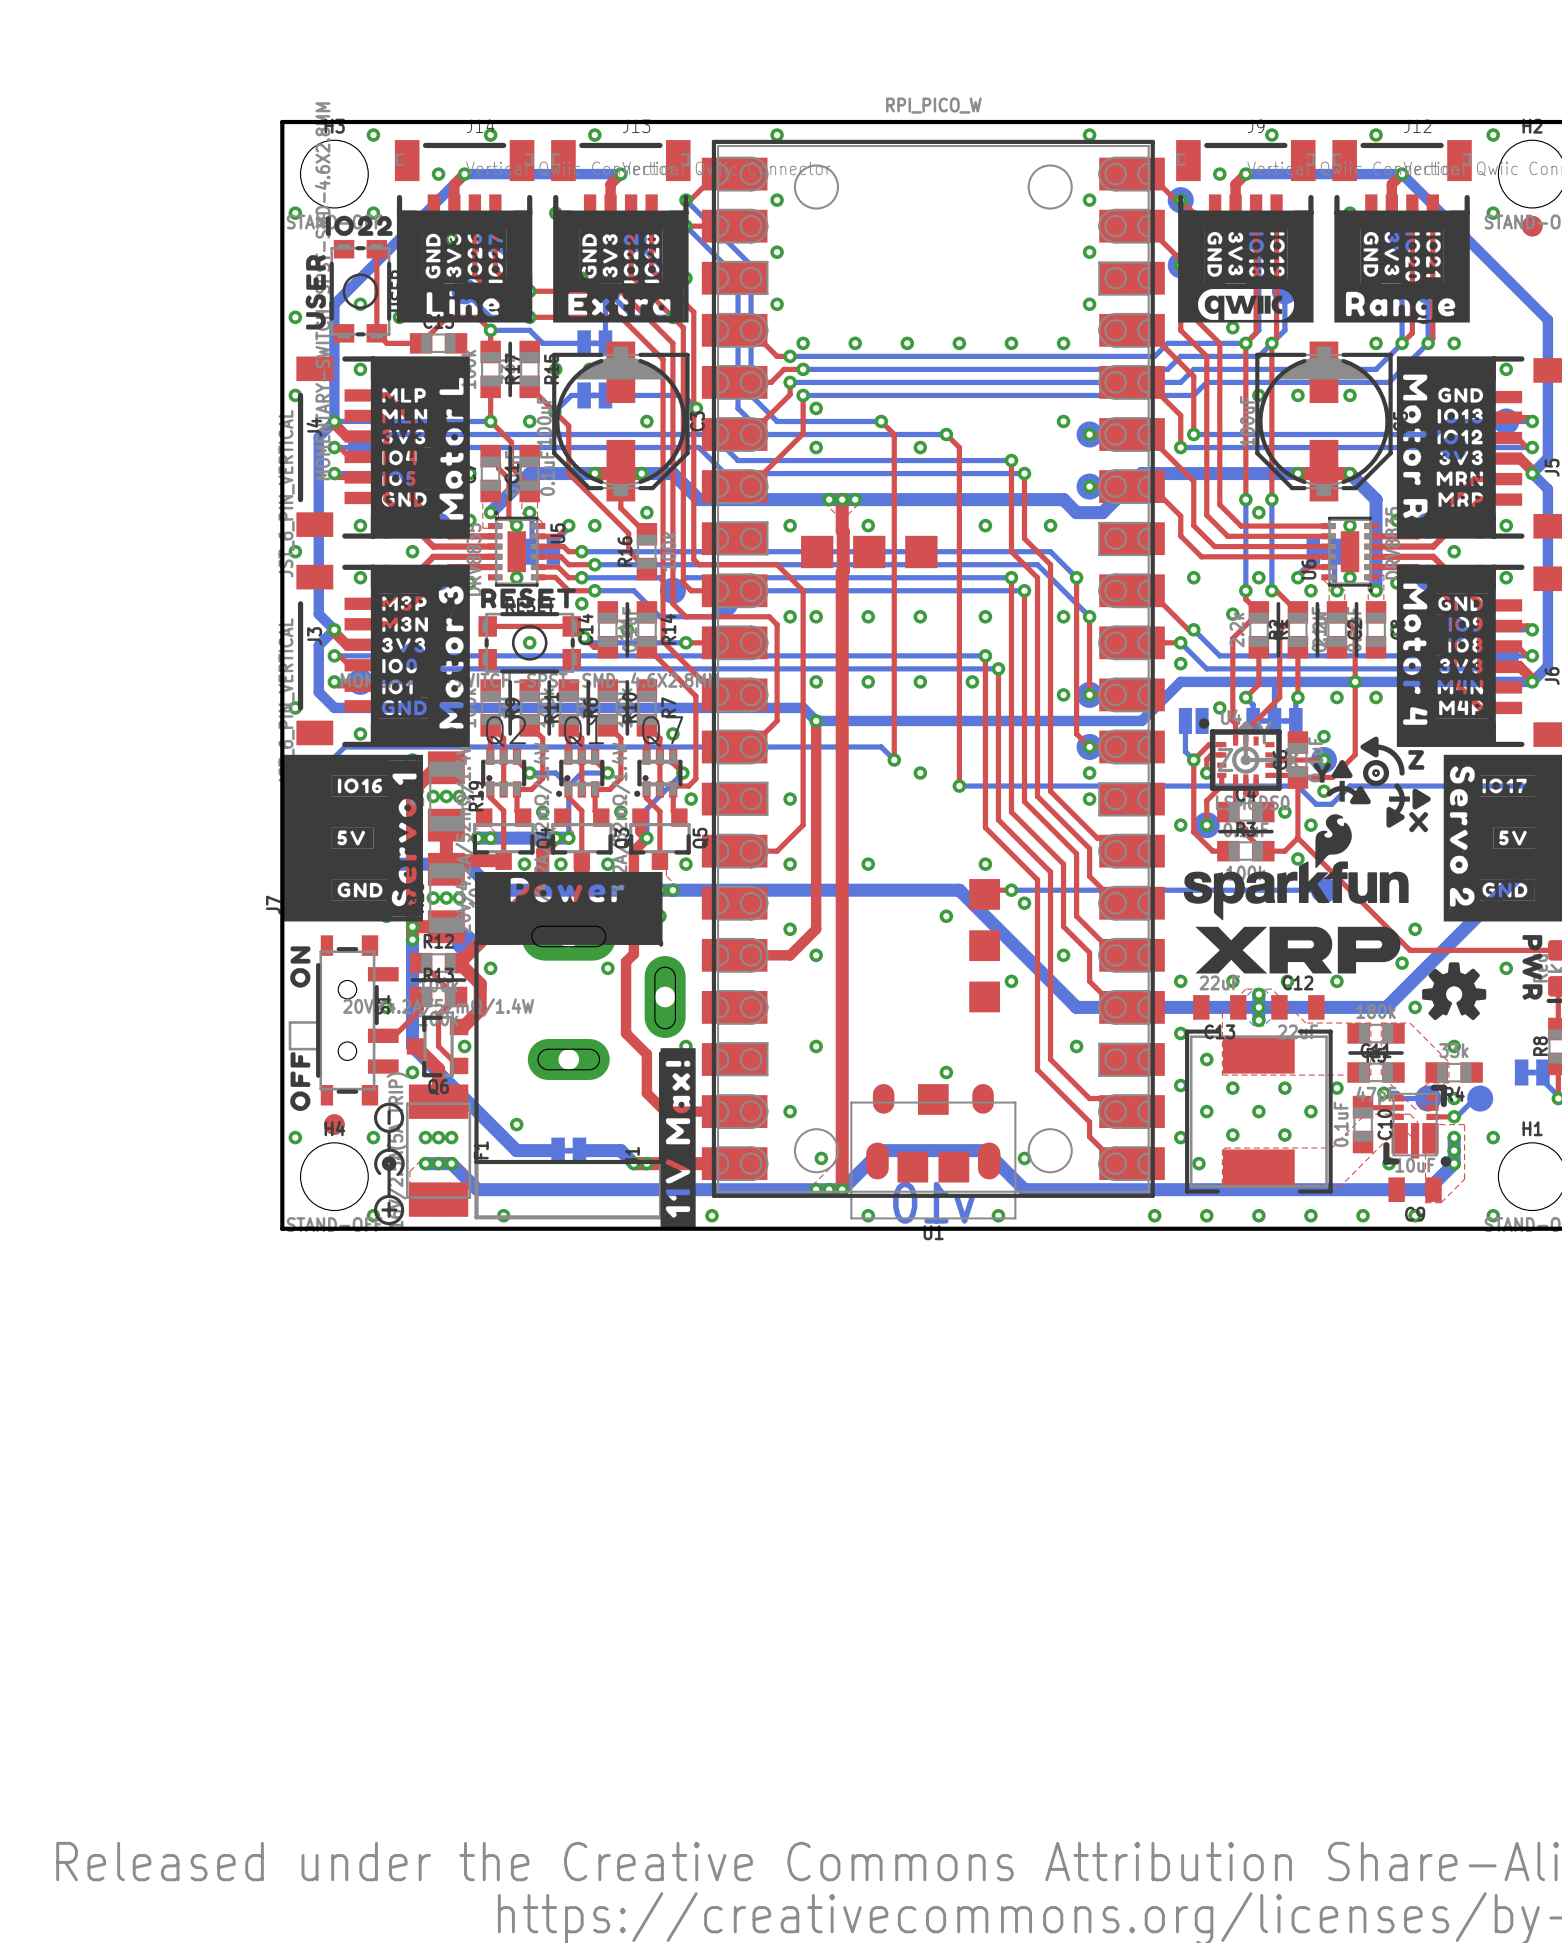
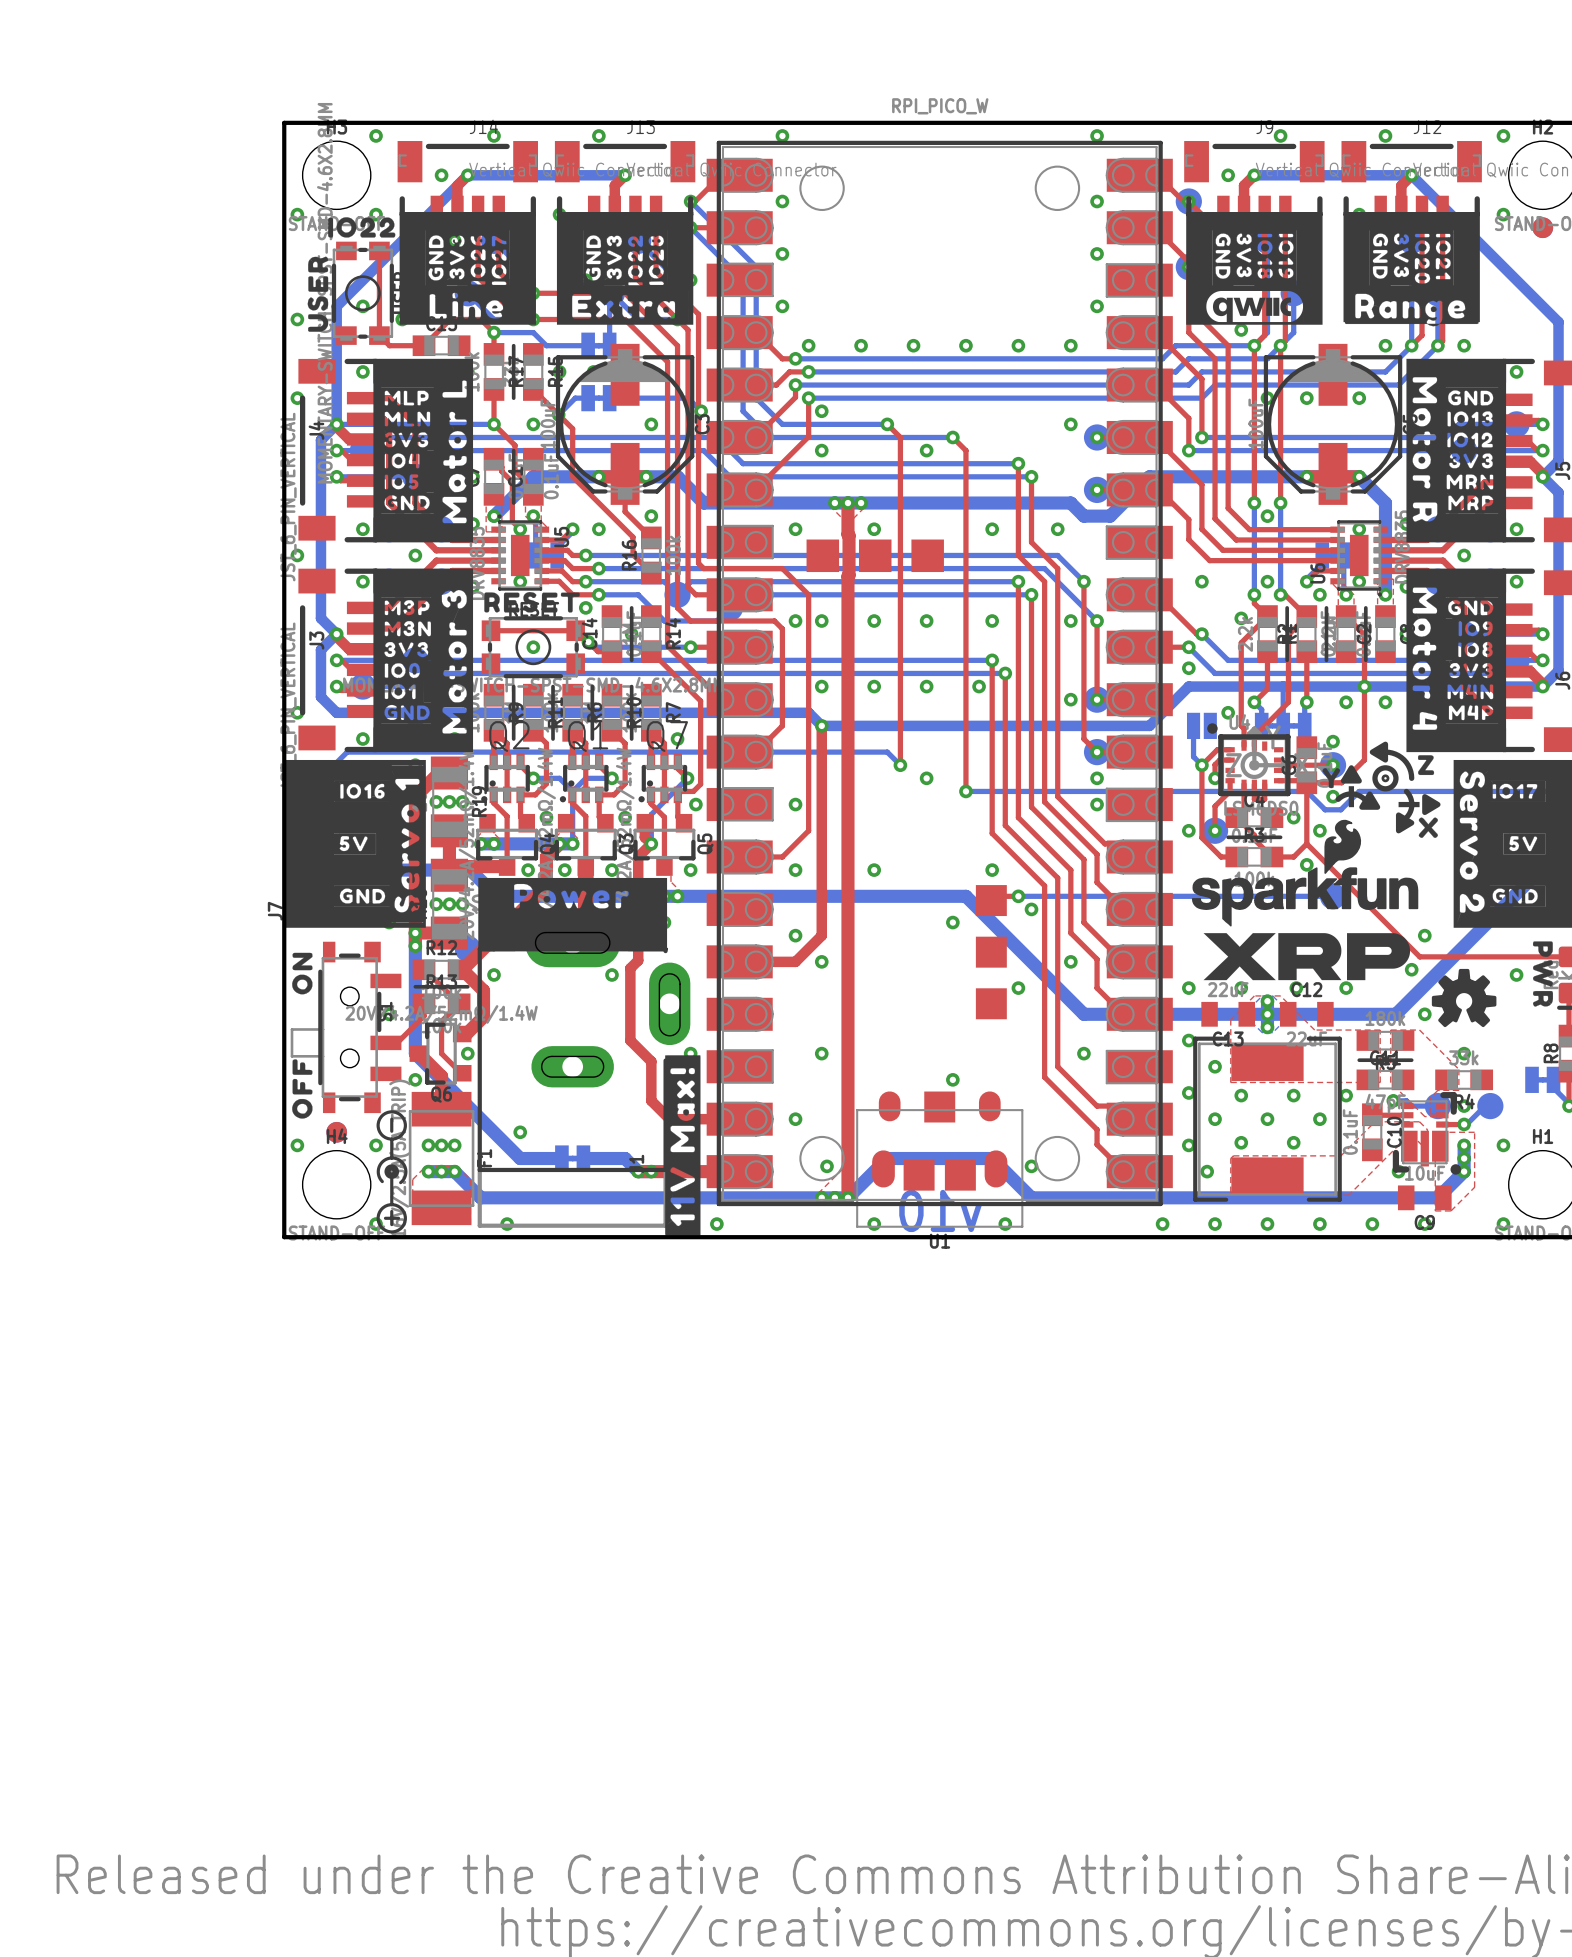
drawing: [1334, 319, 1470, 323] -> none

